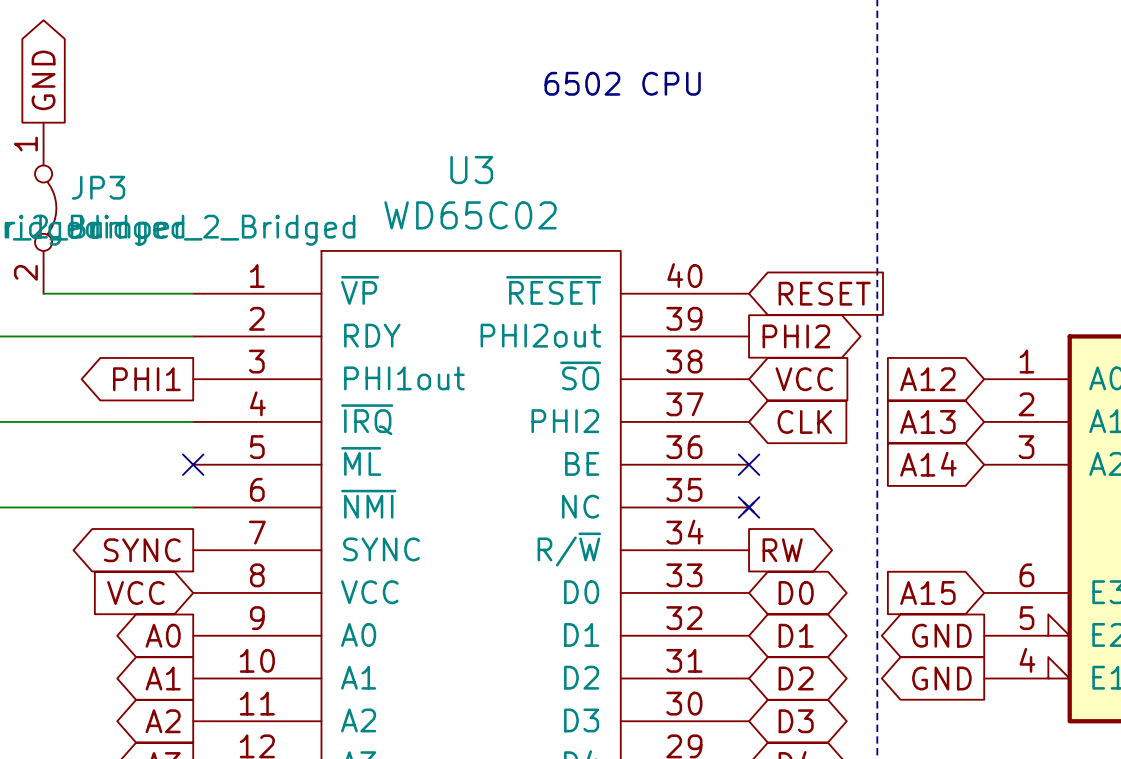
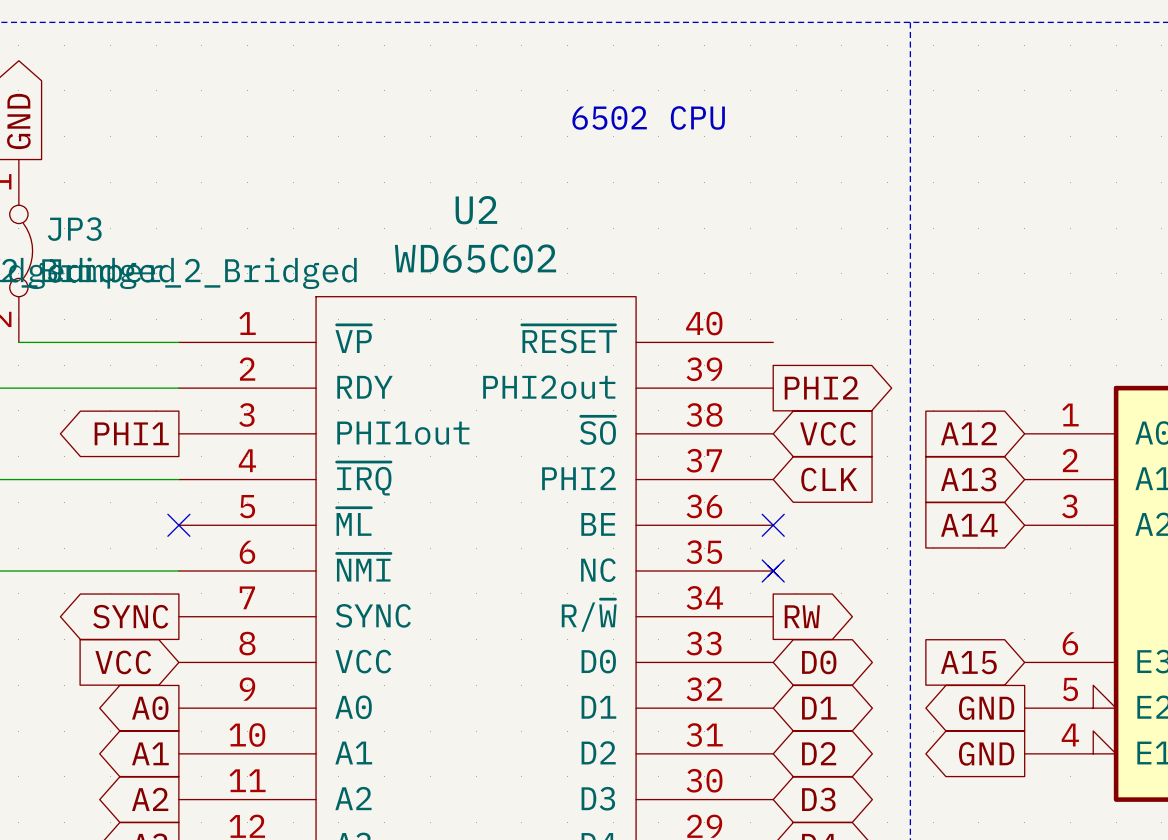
U3 name: U3 (471, 170) -> U2 (476, 210)
global label: RESET (824, 293) -> none

